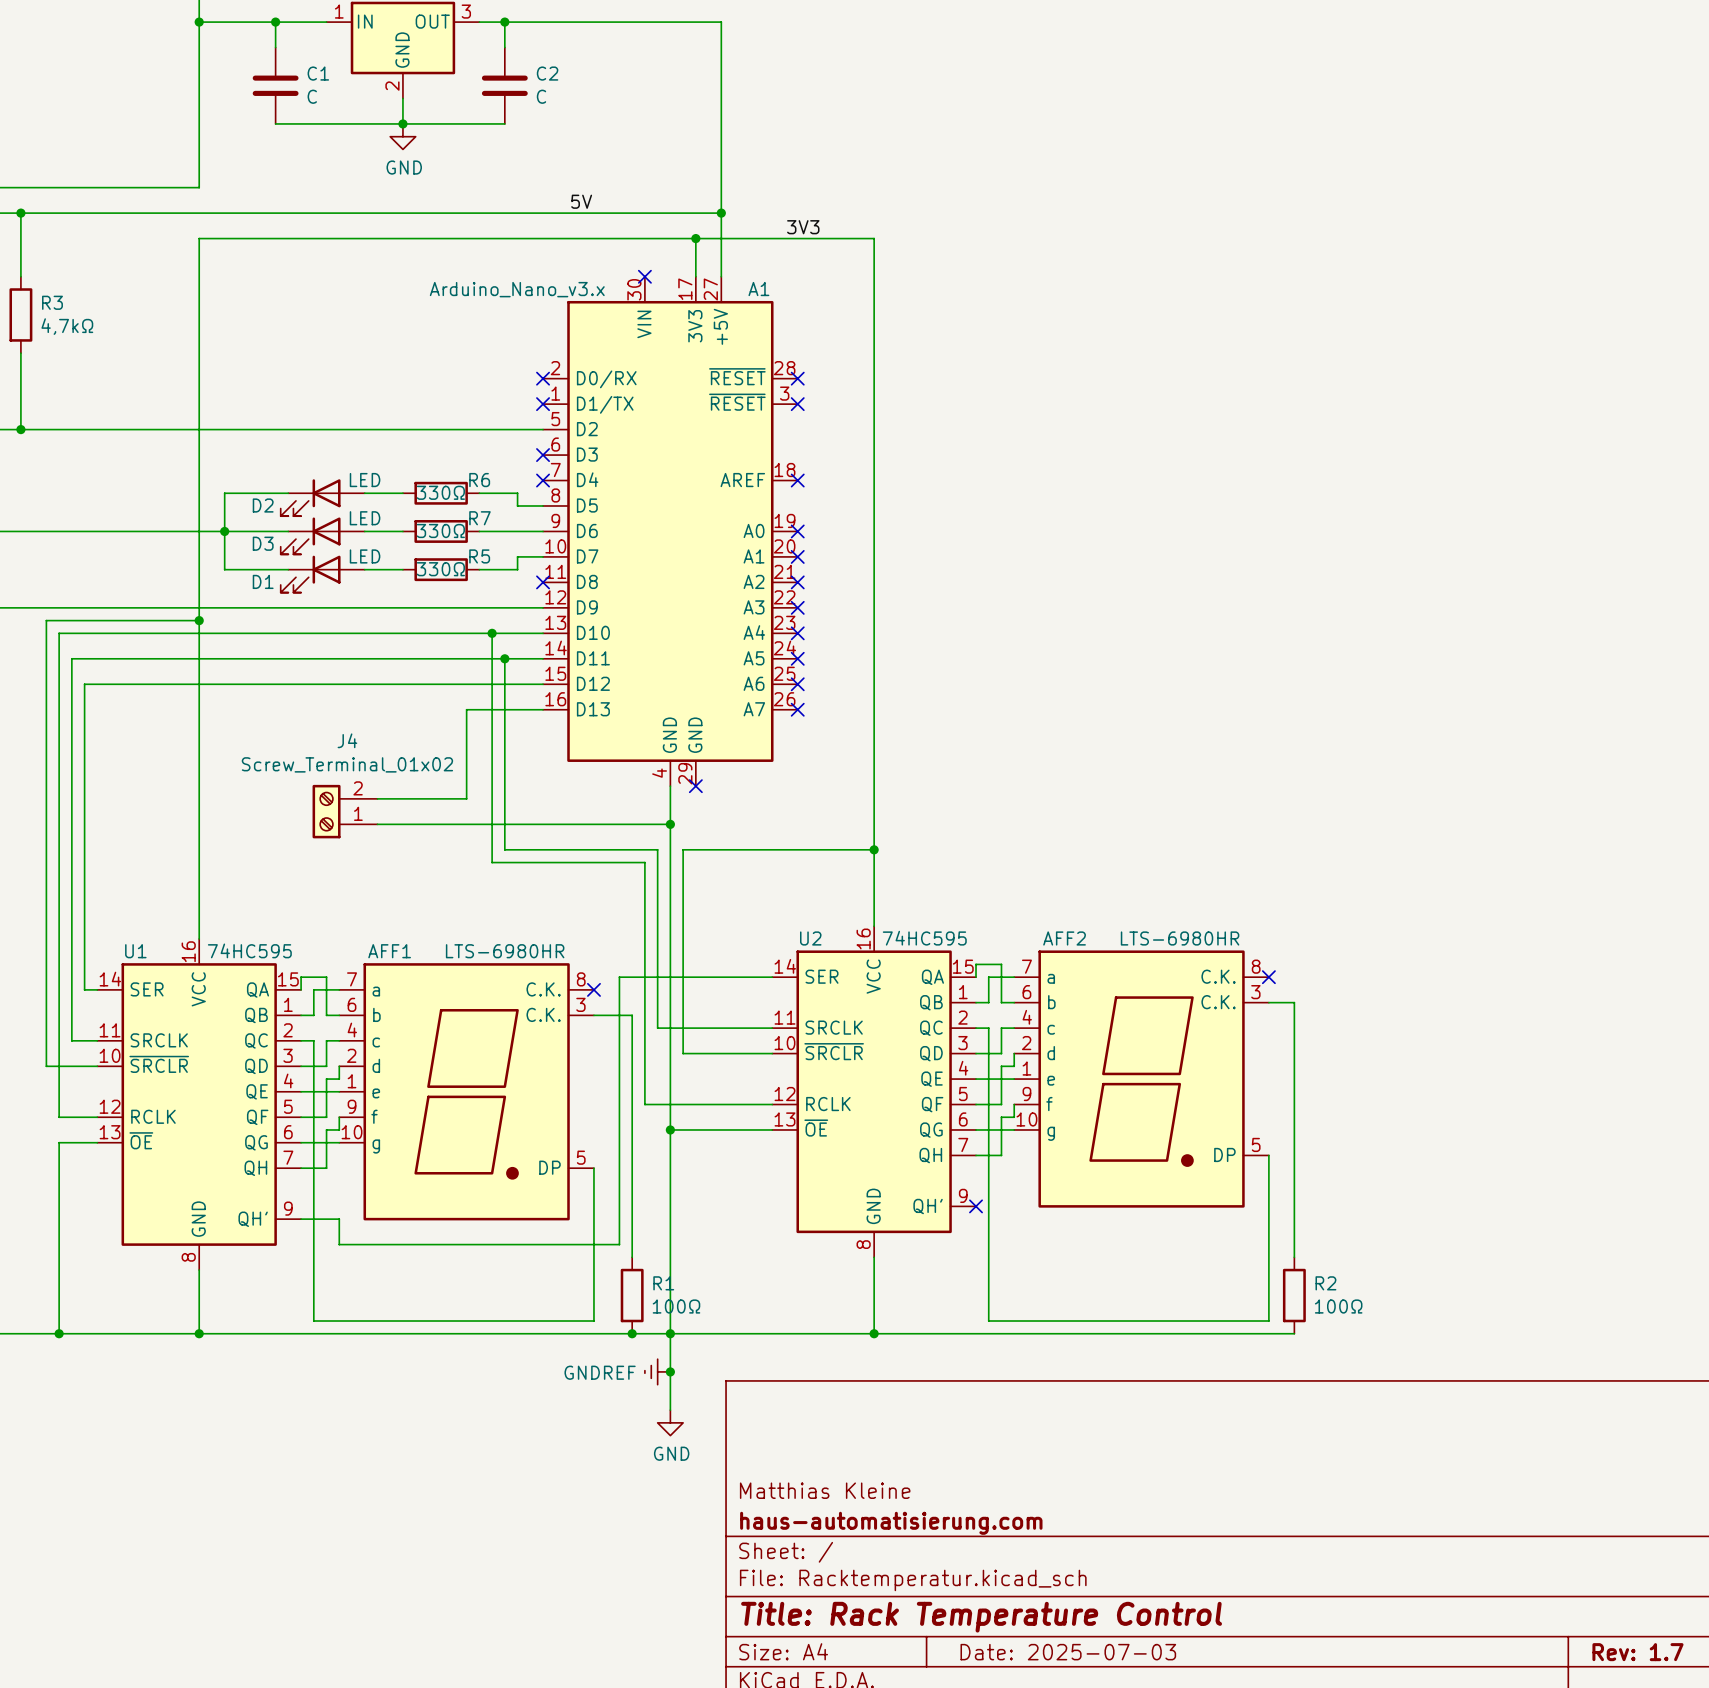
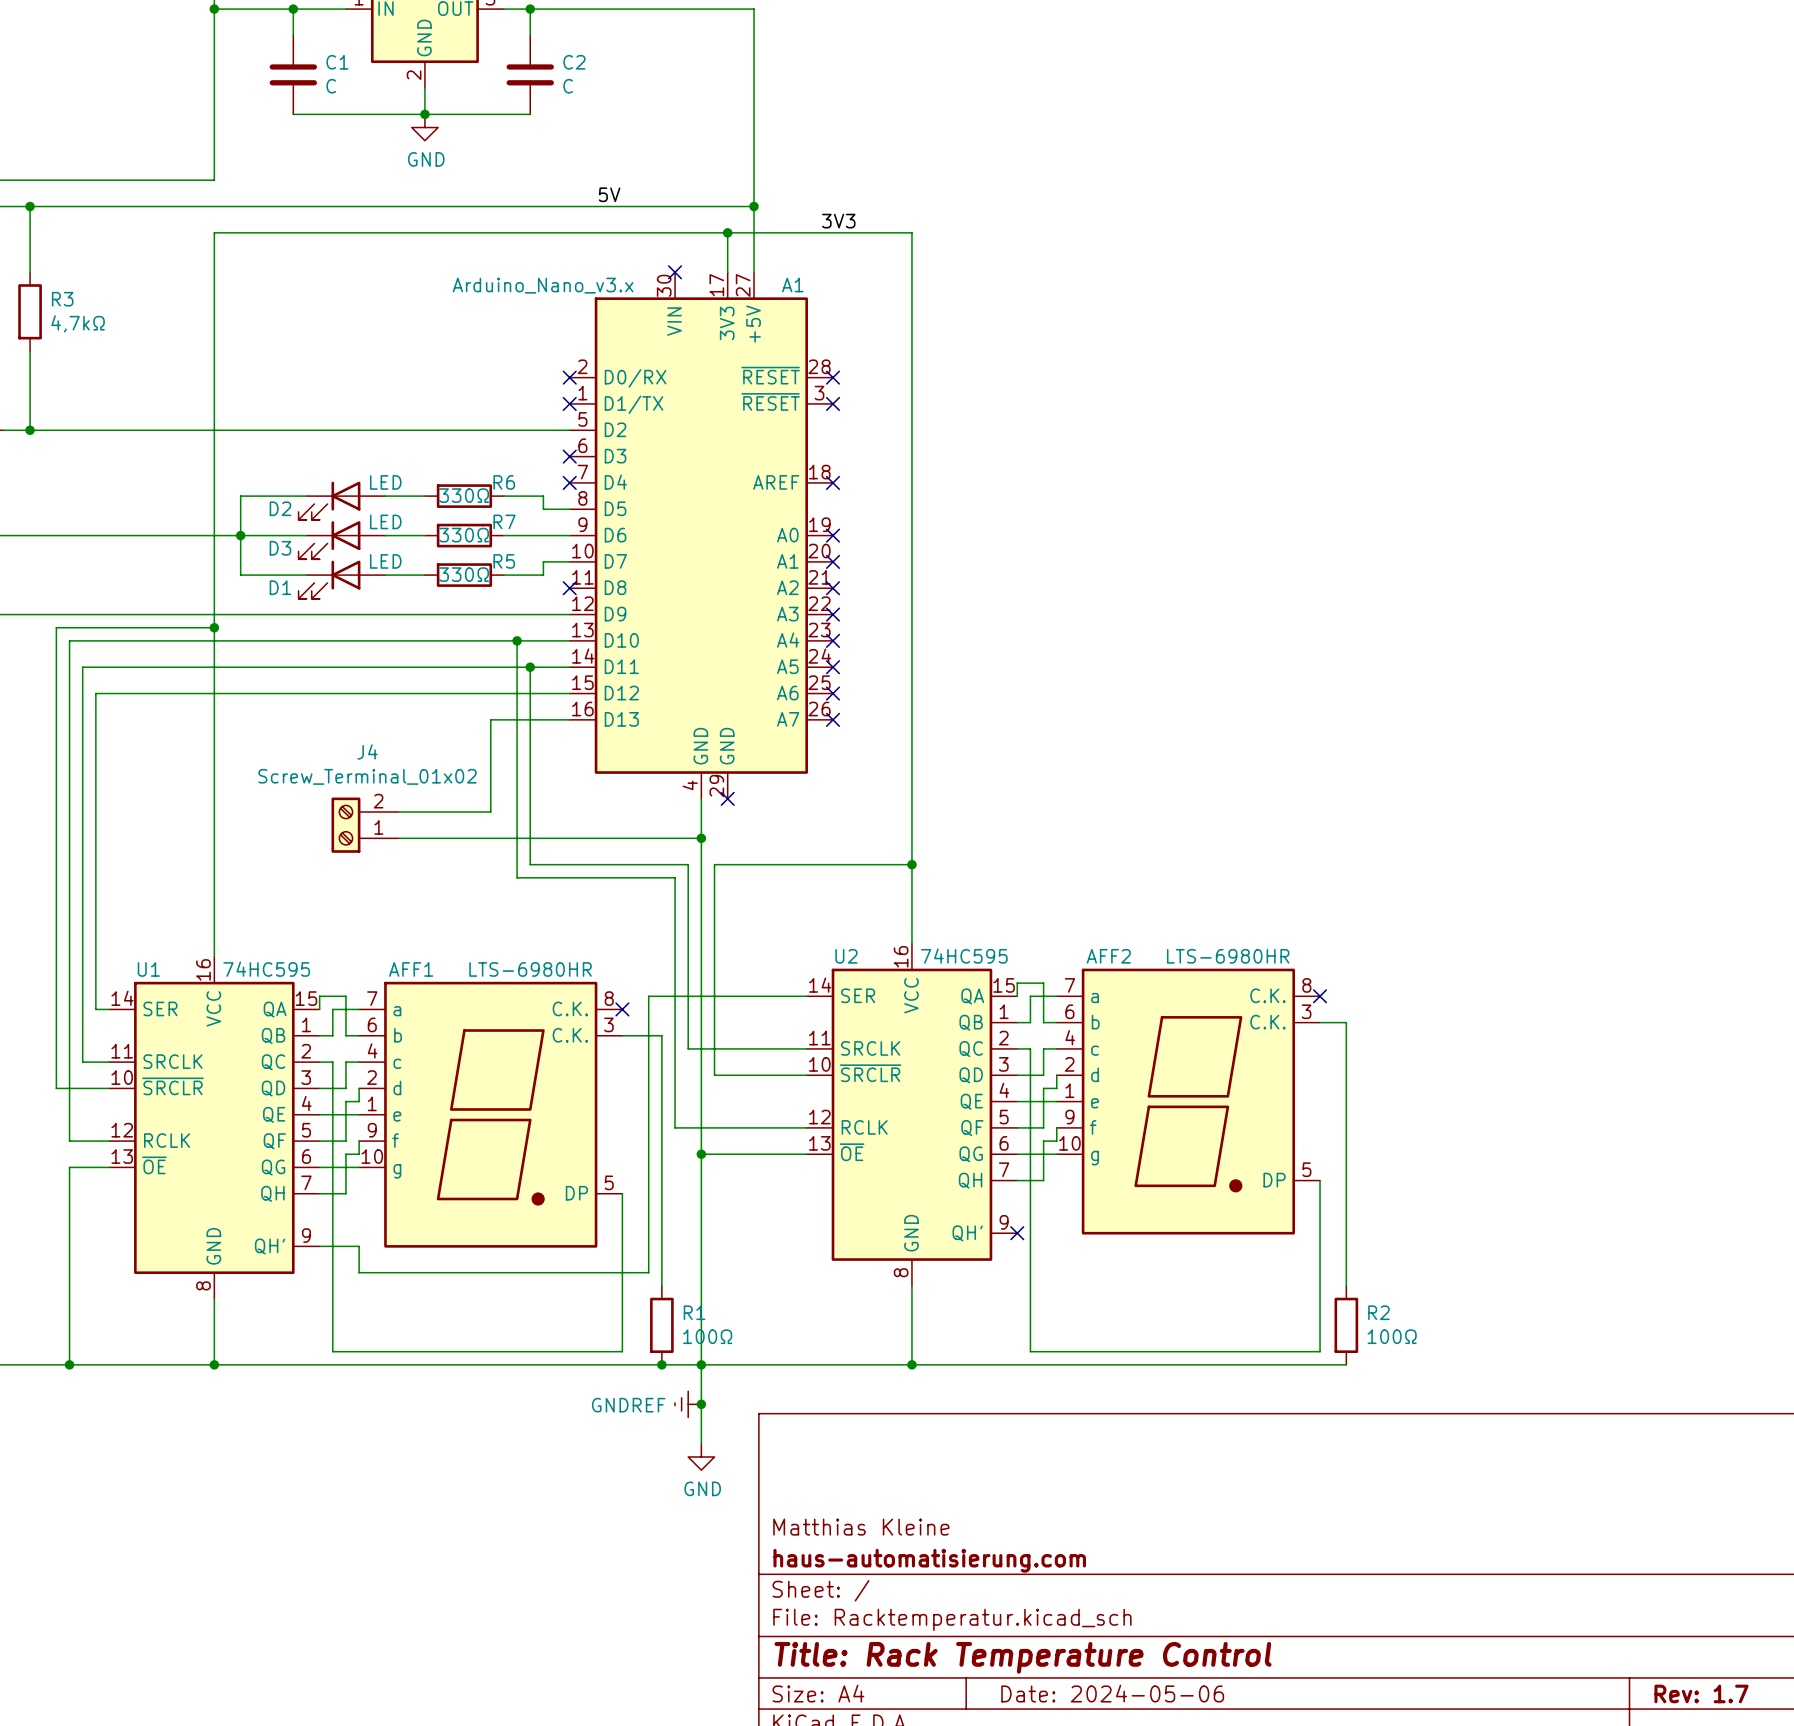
title block: Date: 2025-07-03 (1068, 1652) -> Date: 2024-05-06 (1112, 1693)

